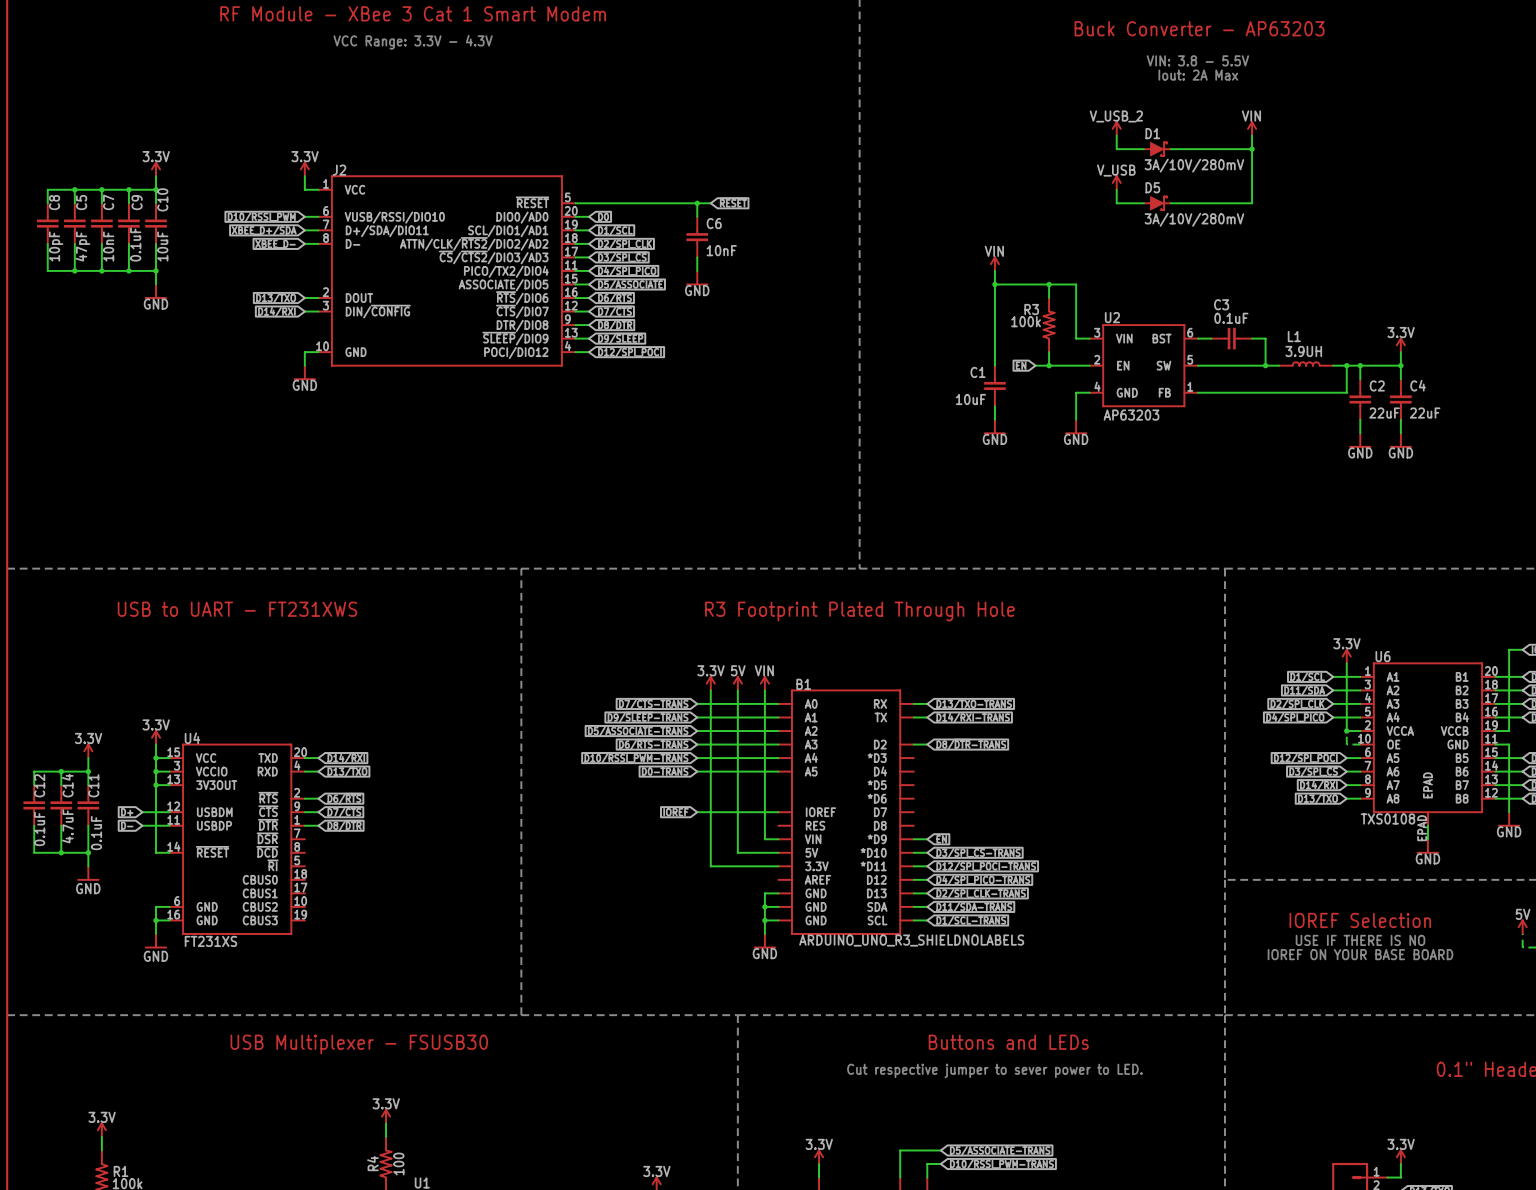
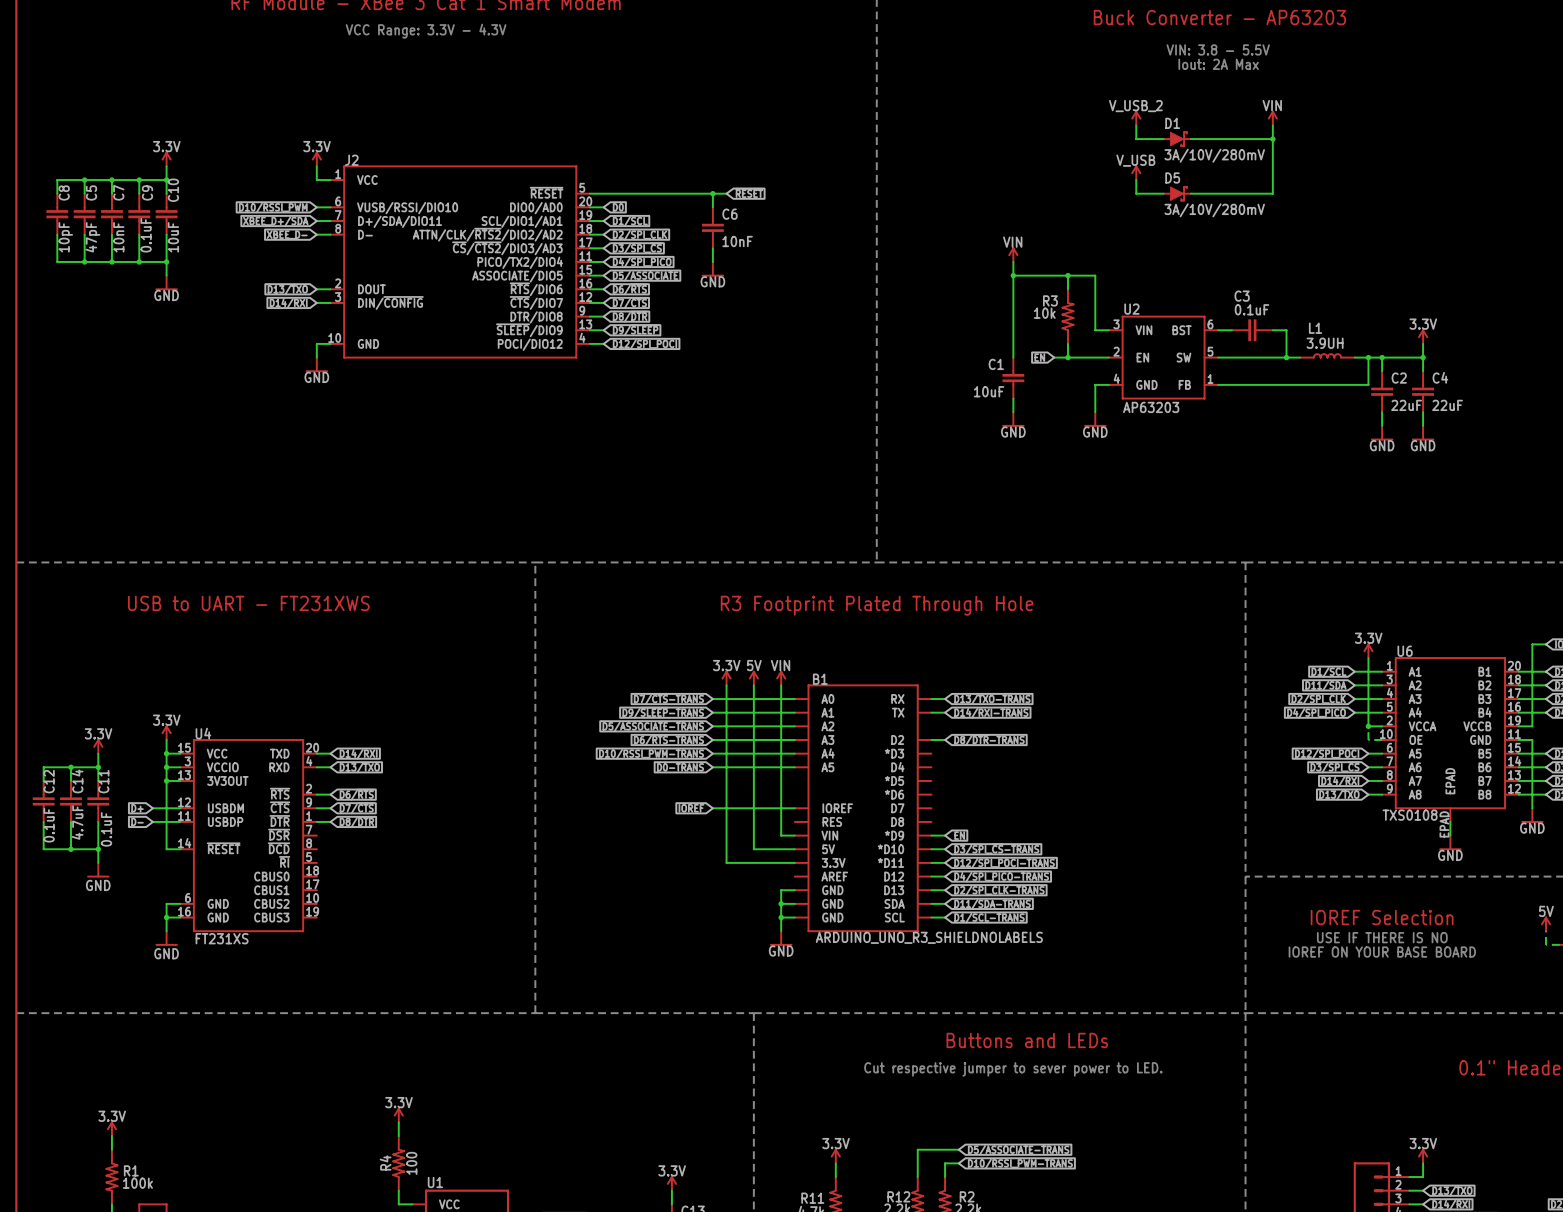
R3 value: 100k (1026, 321) -> 10k (1044, 313)
text: USB Multiplexer - FSUSB30 (359, 1044) -> none

